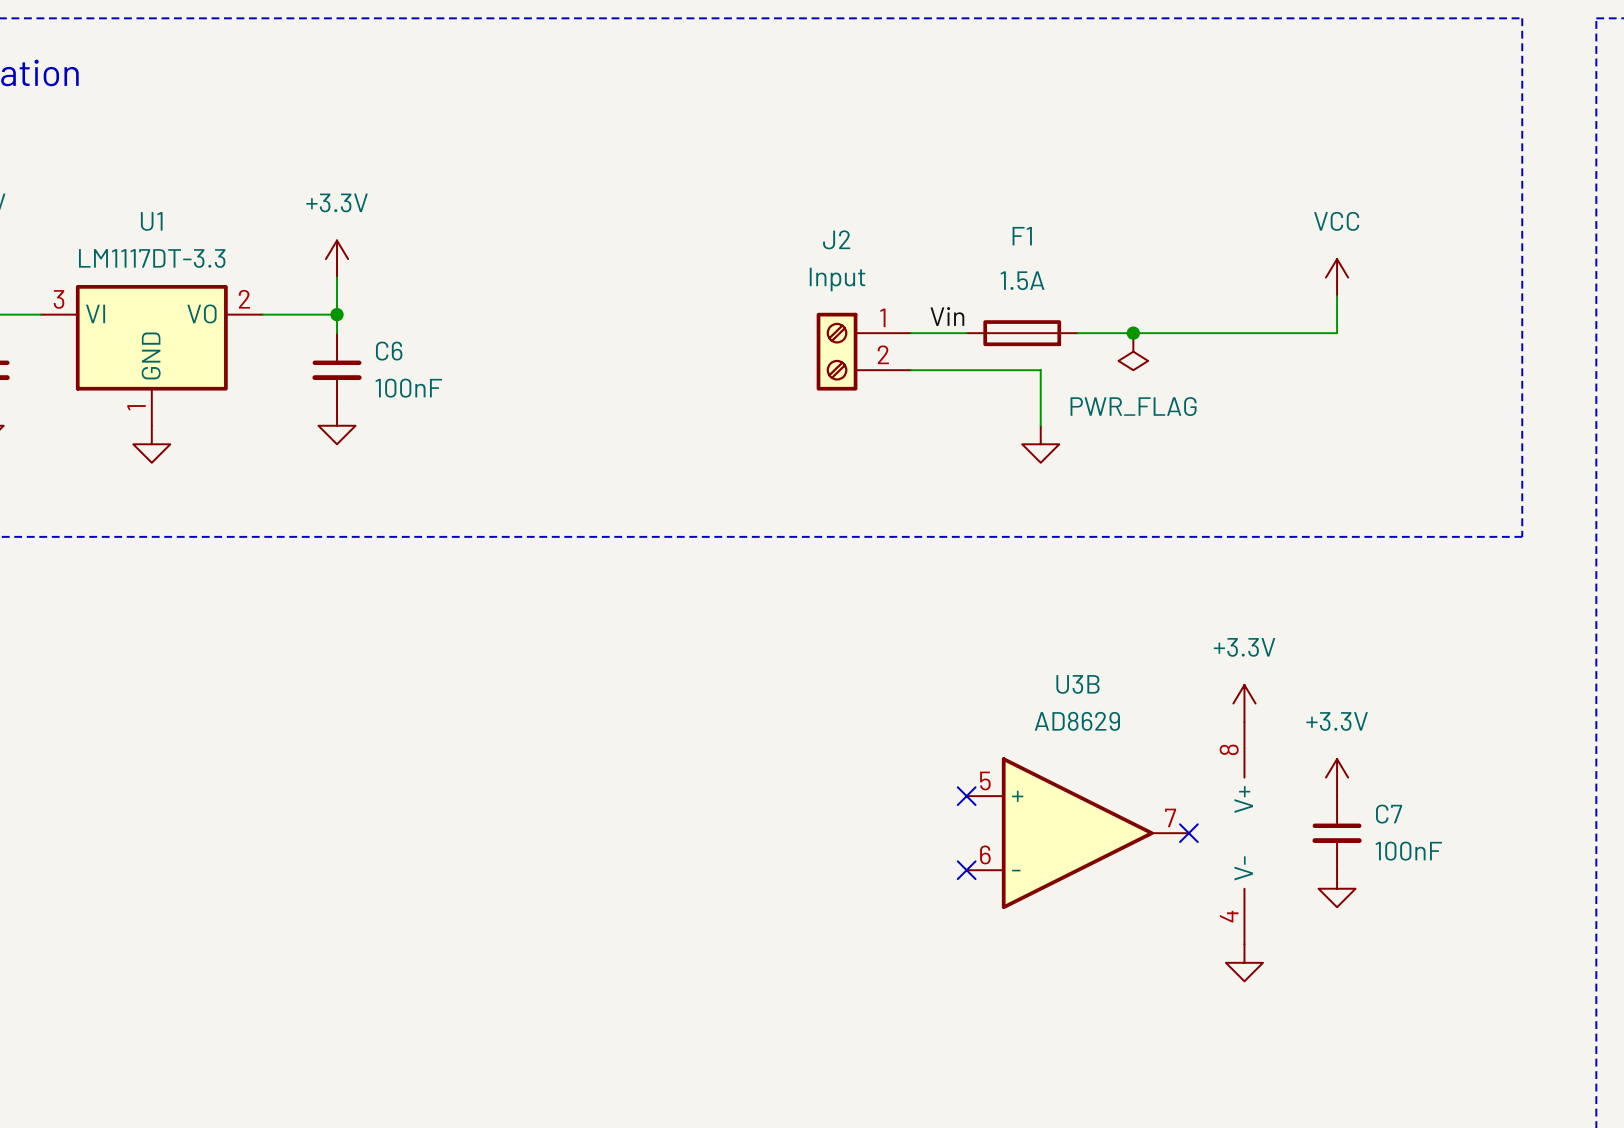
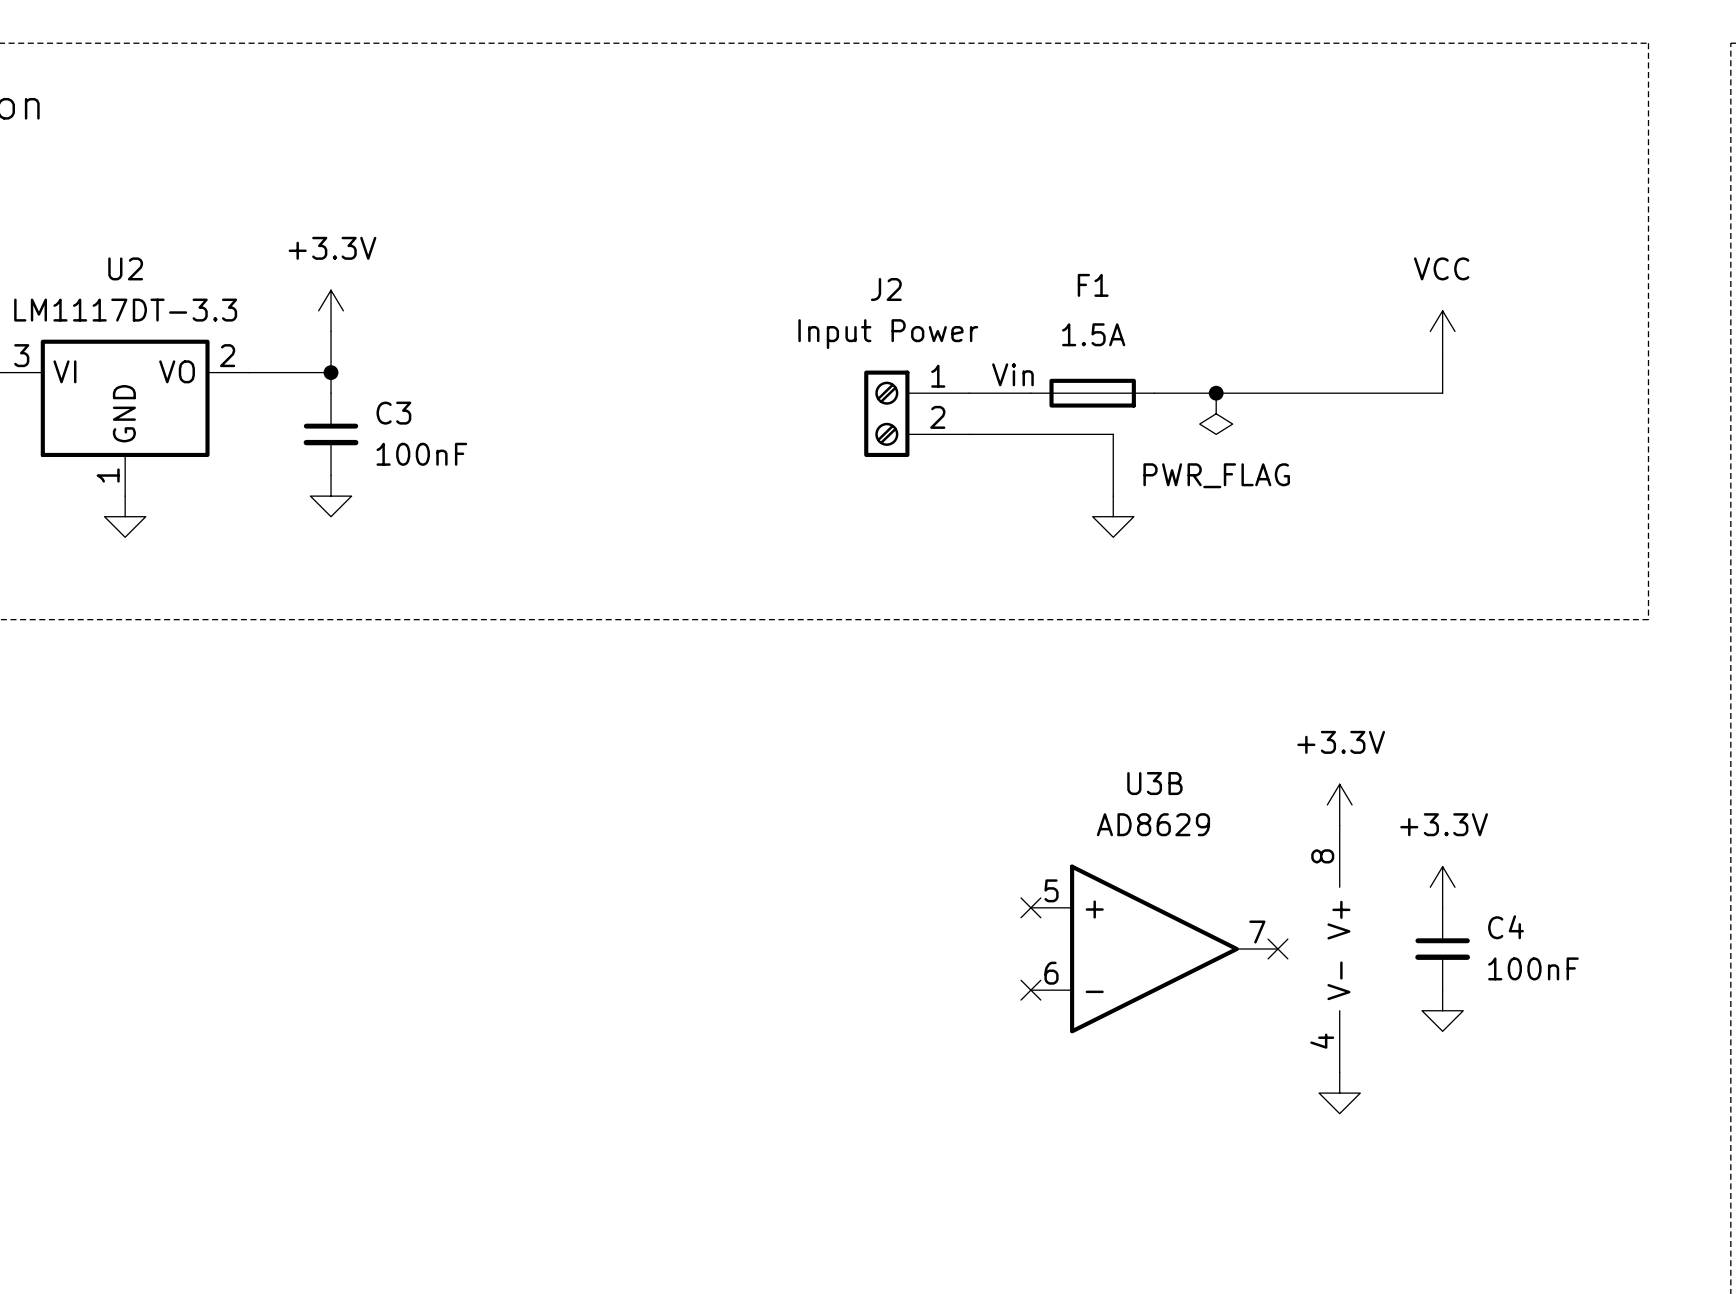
U1 name: U1 (151, 221) -> U2 (125, 268)
J2 value: Input (837, 279) -> Input Power (888, 334)
C6 name: C6 (389, 351) -> C3 (393, 413)
C7 name: C7 (1389, 814) -> C4 (1506, 927)

